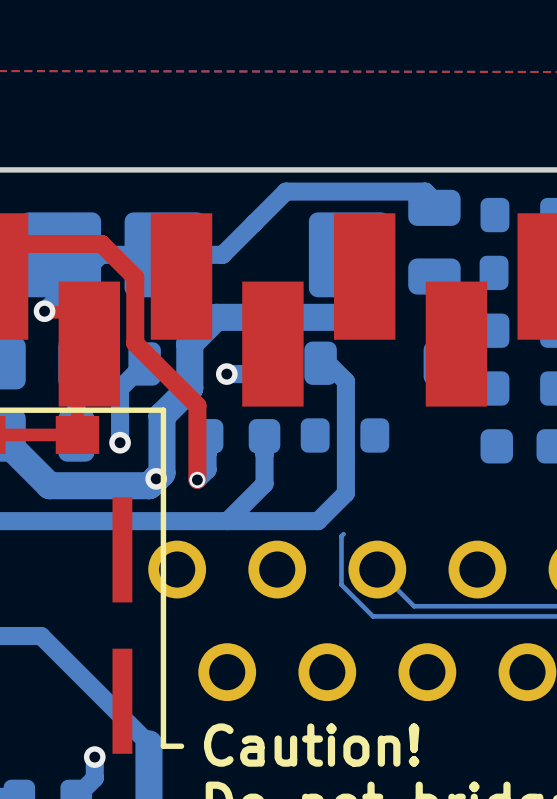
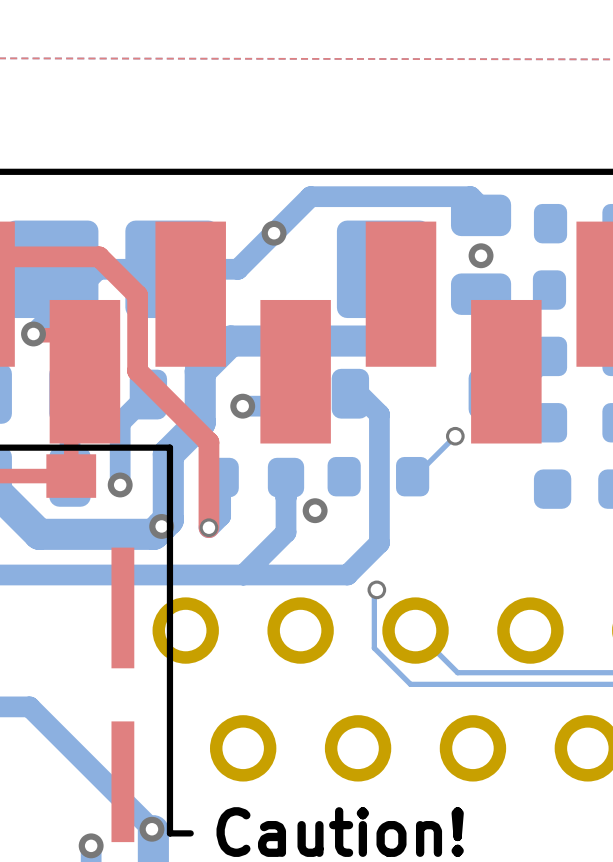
via: none -> (274, 233)
via: none -> (481, 255)
bottom track: none -> (455, 436) (414, 476)
via: none -> (455, 436)
via: none -> (315, 510)
via: none -> (376, 589)
via: none -> (151, 829)

